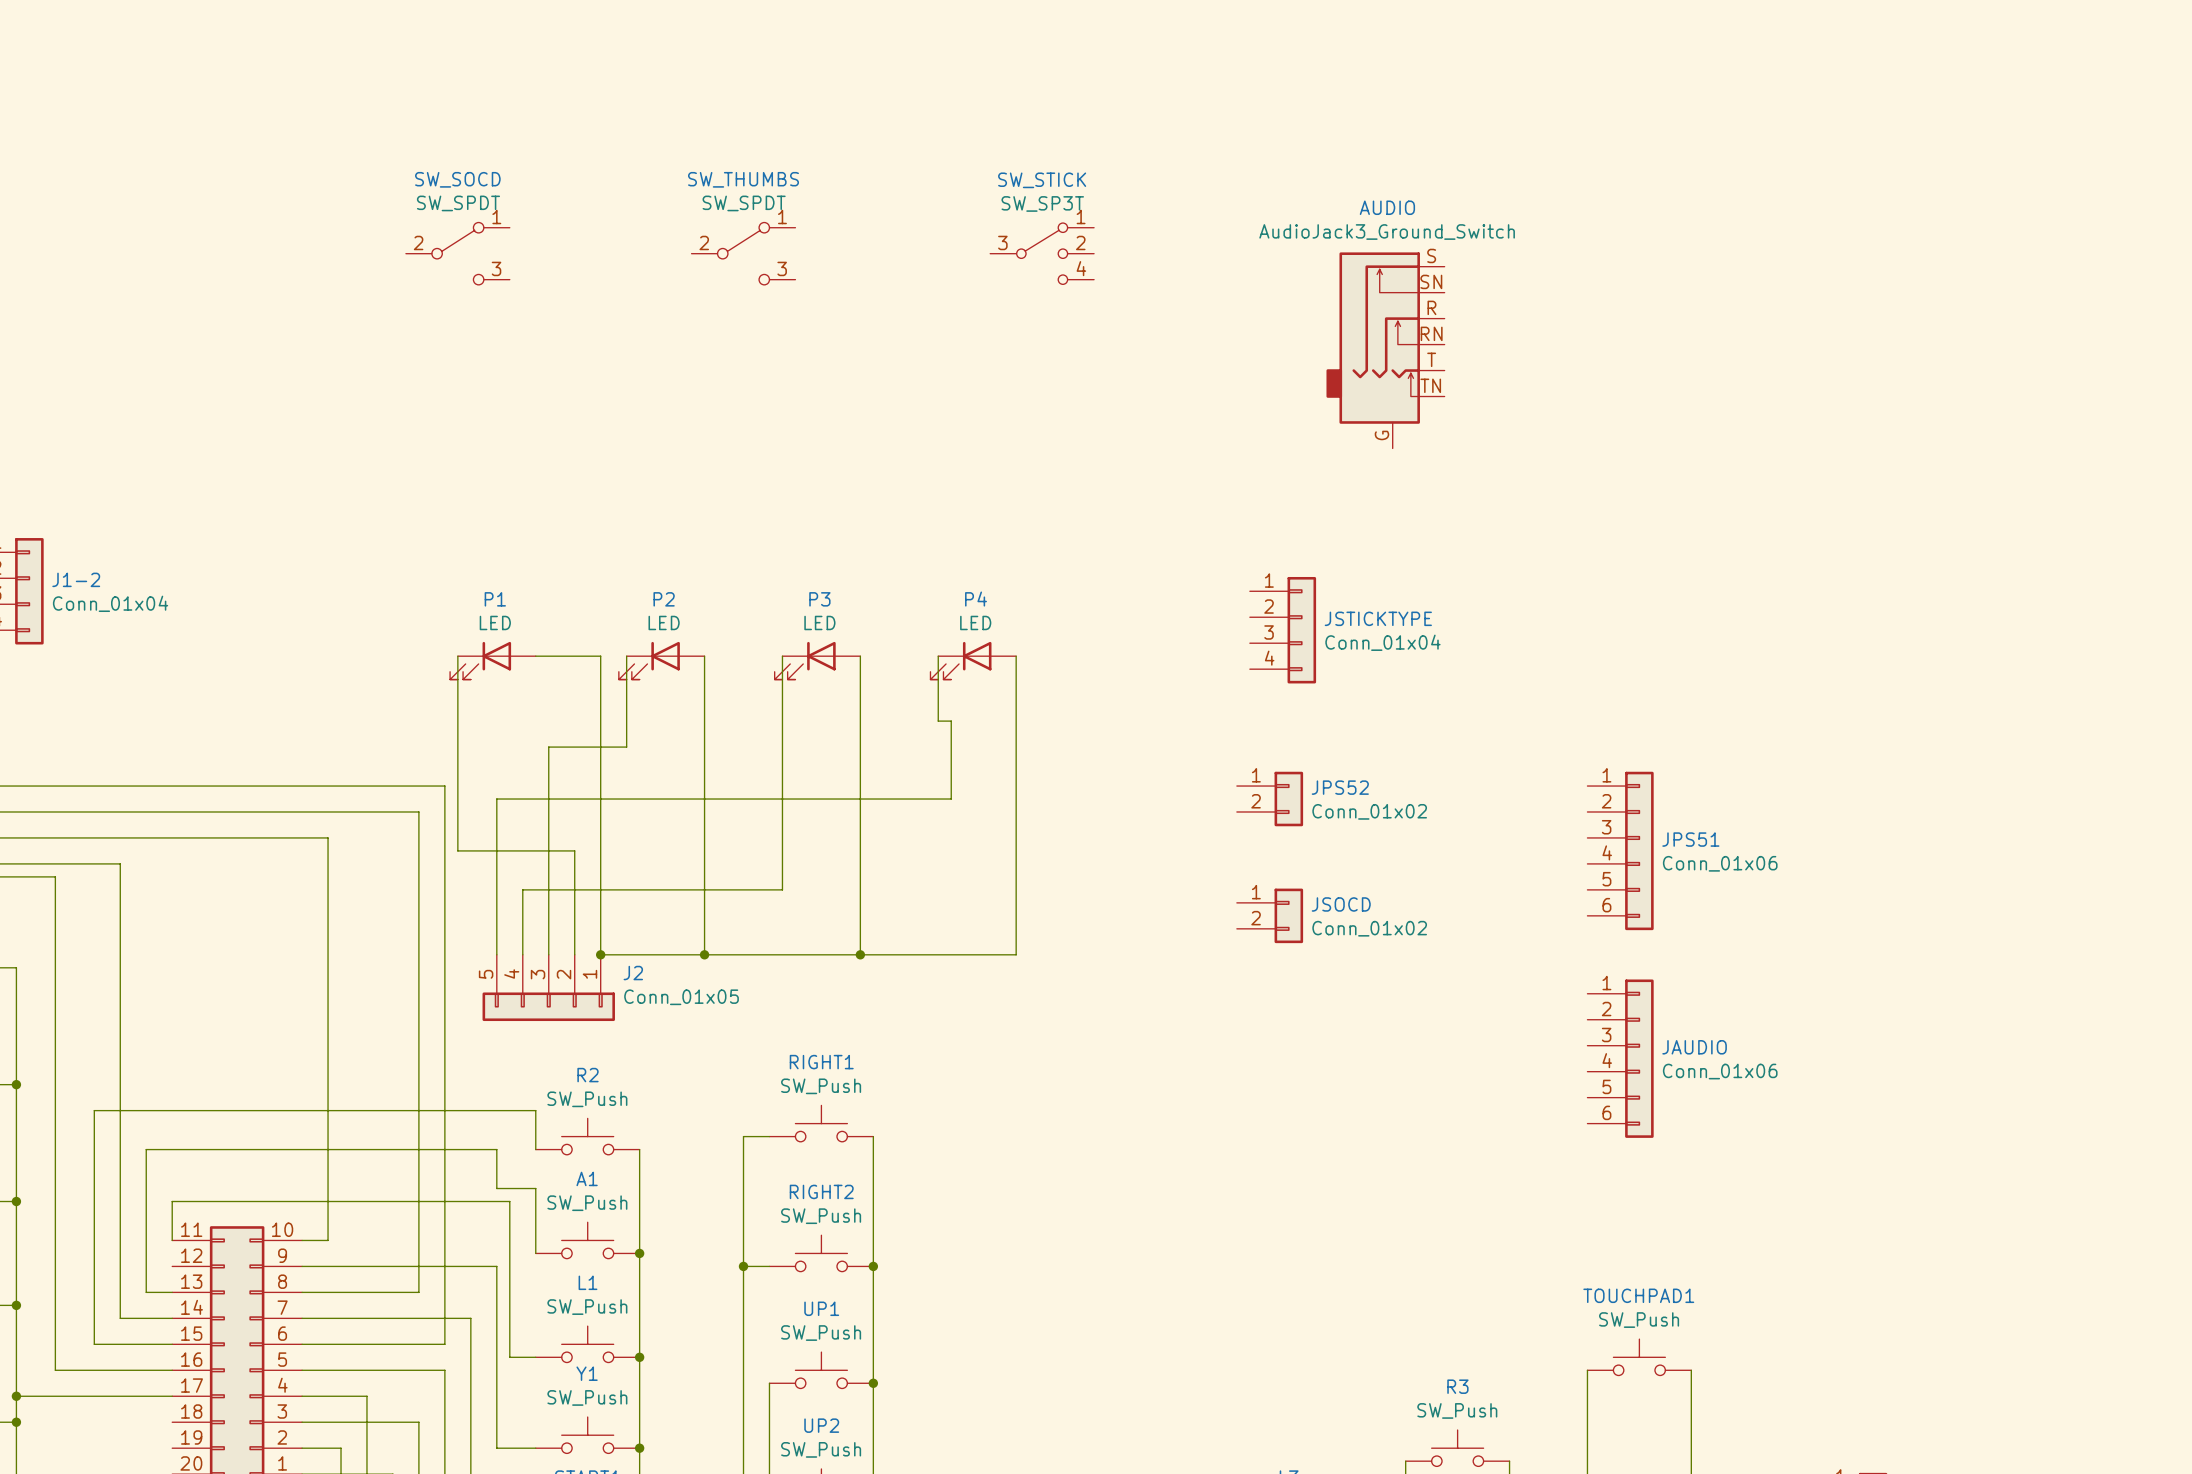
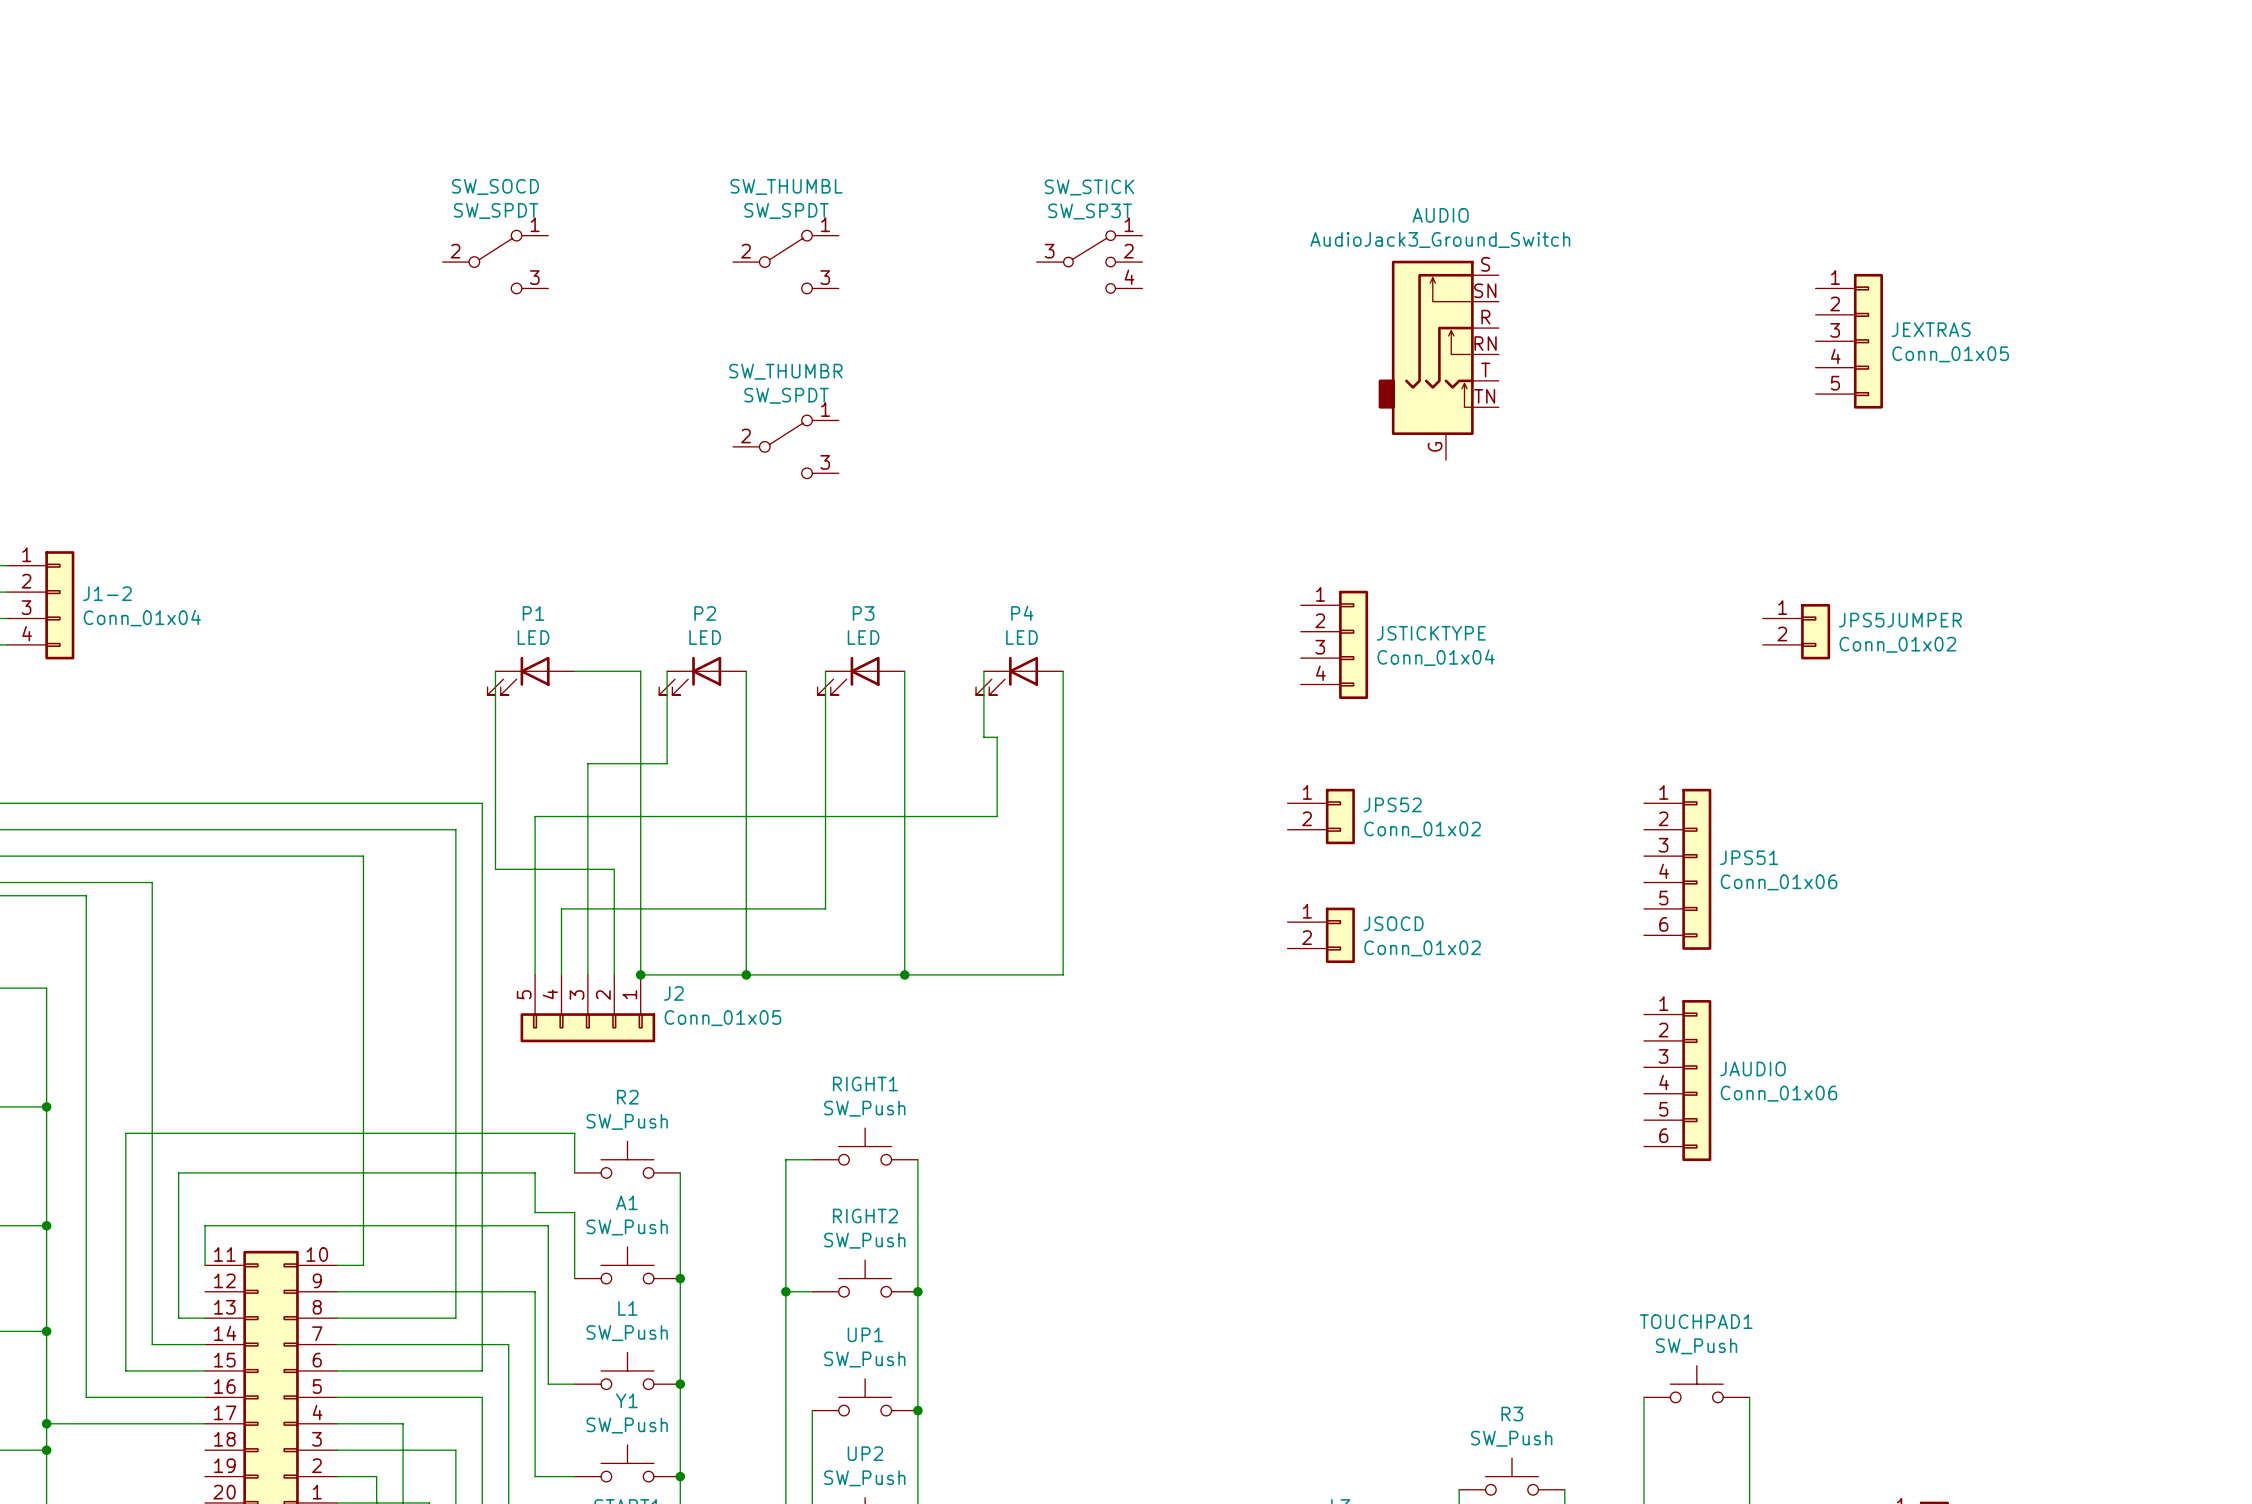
SW_THUMBS name: SW_THUMBS (743, 179) -> SW_THUMBL (786, 186)
JEXTRAS: none -> Conn_01x05 (1849, 341)
SW_THUMBR: none -> SW_SPDT (785, 446)
JPS5JUMPER: none -> Conn_01x02 (1796, 631)

